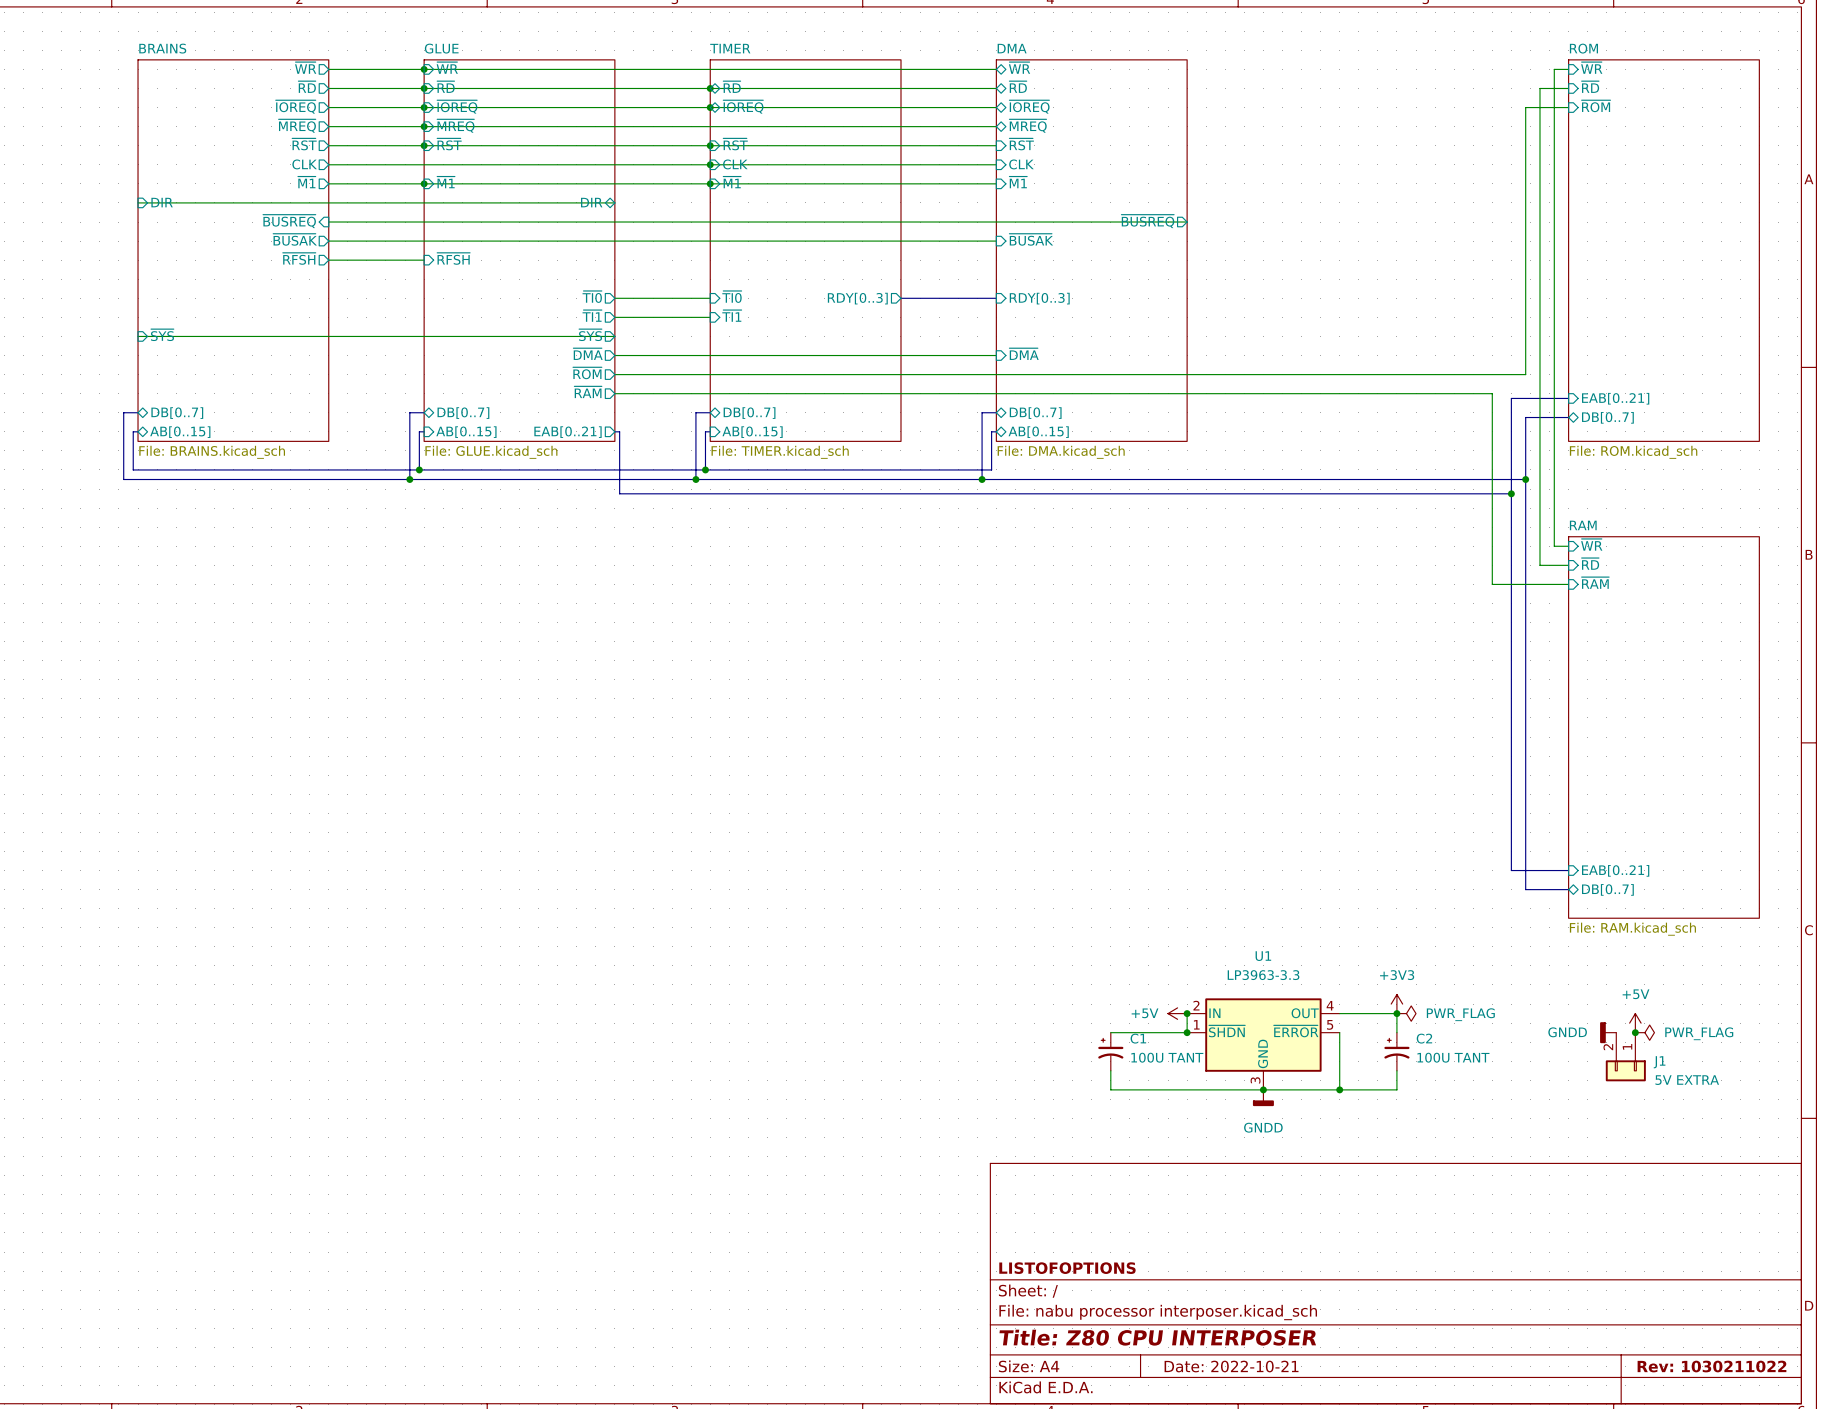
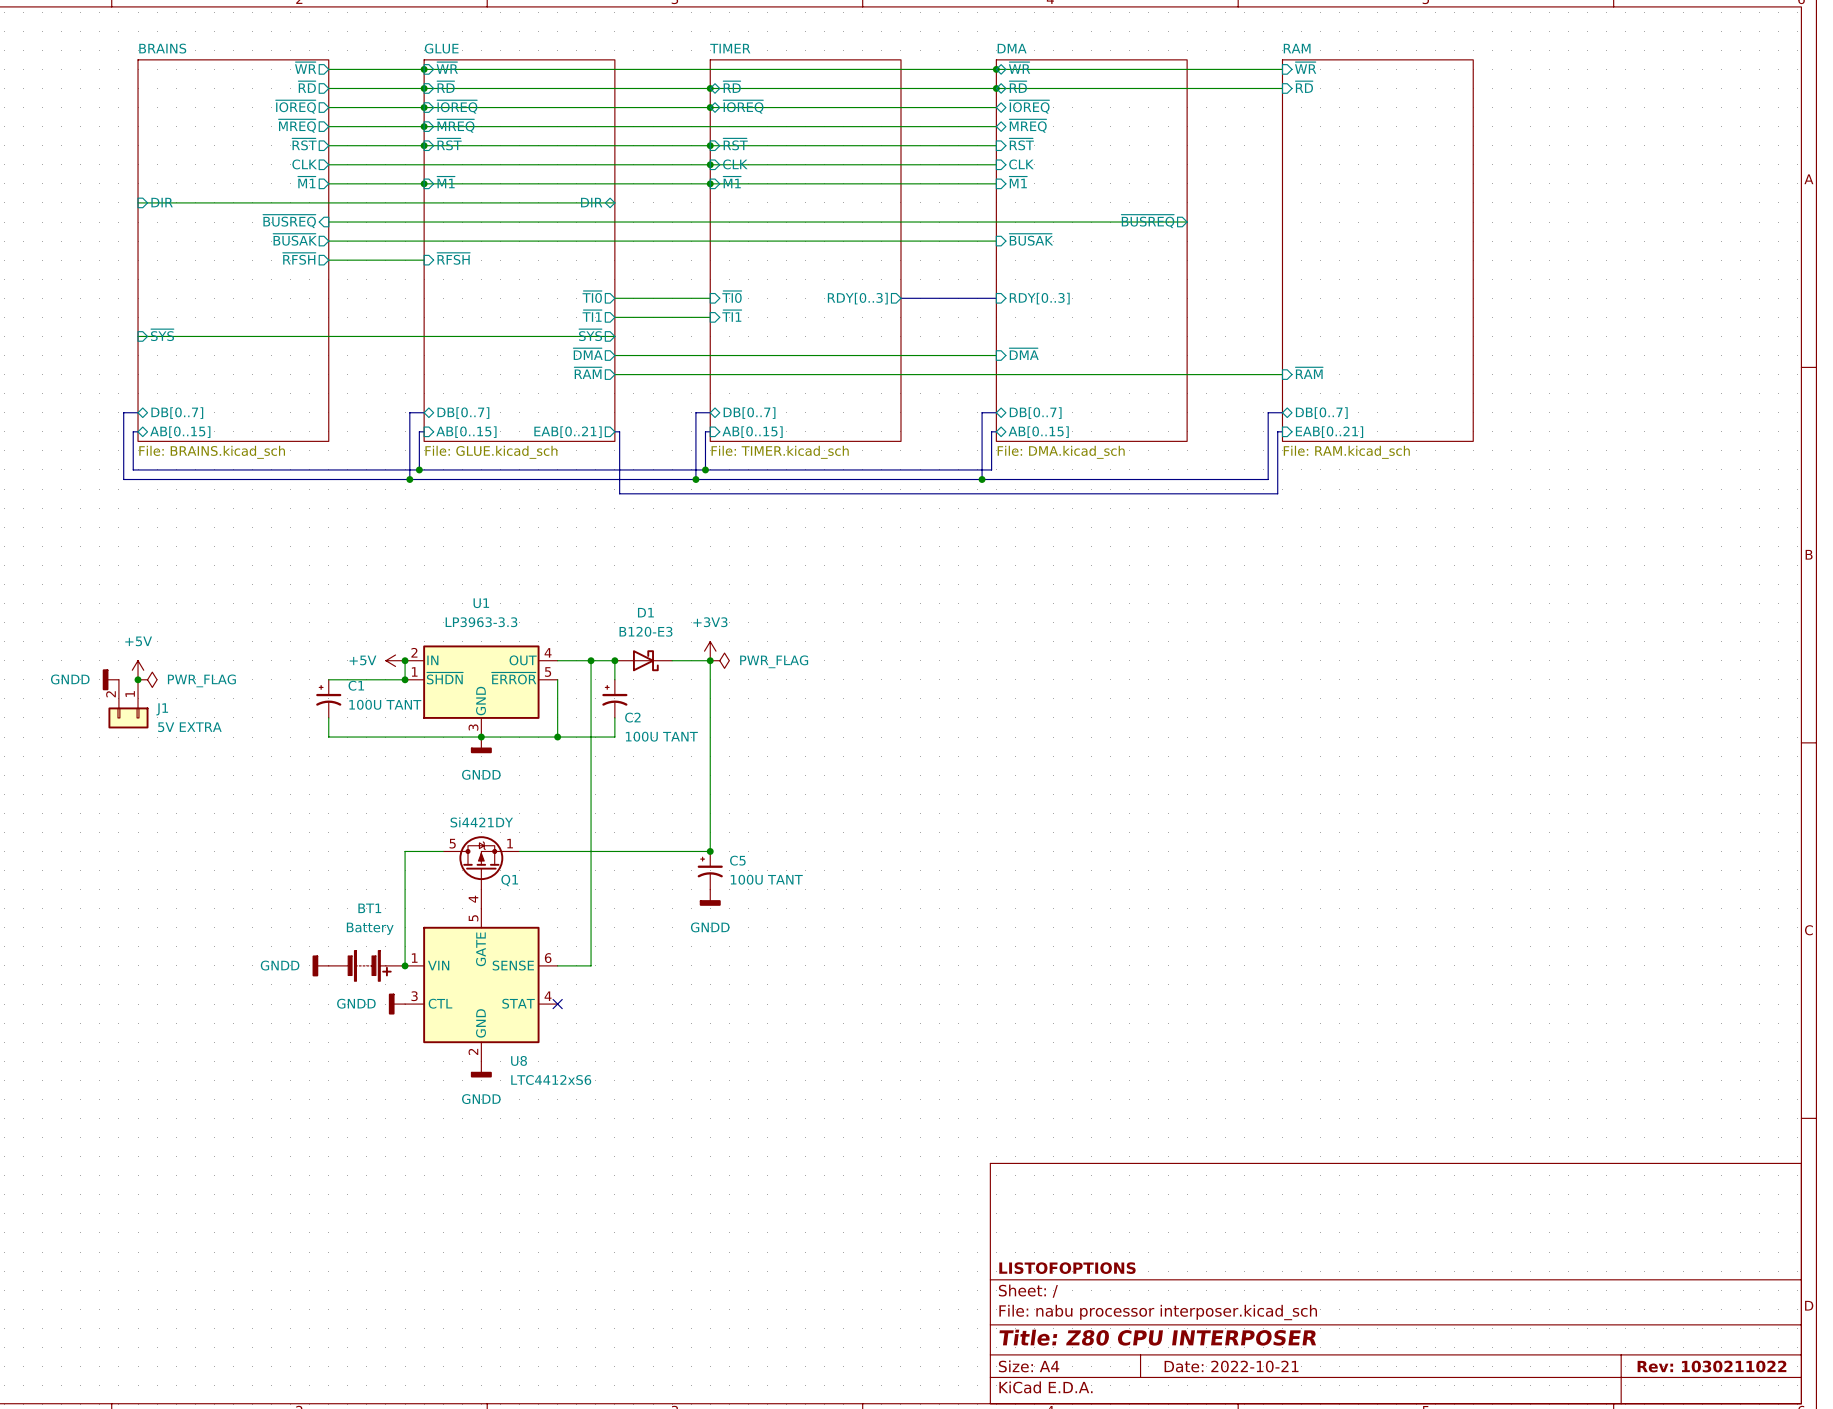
sheet pin: none -> ~{WR} (1305, 67)
sheet pin: ~{WR} (1591, 67) -> none
wire: none -> (996, 69) (1282, 69)
junction: none -> (996, 69)
wire: (1568, 69) (1554, 69) (1554, 546) (1568, 546) -> none
sheet pin: none -> ~{RD} (1304, 87)
sheet pin: ~{RD} (1590, 87) -> none
wire: none -> (996, 88) (1282, 88)
junction: none -> (996, 88)
wire: (1568, 88) (1539, 88) (1539, 565) (1568, 565) -> none
sheet pin: ~{ROM} (1596, 106) -> none
wire: (1568, 107) (1525, 107) (1525, 374) (1282, 374) -> none
sheet RAM: none -> File: RAM.kicad_sch (1377, 250)
sheet ROM: File: ROM.kicad_sch (1663, 250) -> none
sheet pin: ~{ROM} (587, 373) -> ~{RAM} (588, 373)
sheet pin: none -> ~{RAM} (1309, 373)
sheet pin: ~{RAM} (588, 392) -> none
wire: (614, 393) (1492, 393) (1492, 584) (1568, 584) -> none
bus: (1568, 398) (1511, 398) (1511, 870) (1568, 870) -> none
sheet pin: EAB[0..21] (1615, 398) -> none
sheet pin: none -> DB[0..7] (1321, 413)
bus: (1568, 417) (1525, 417) (1525, 889) (1568, 889) -> none
sheet pin: DB[0..7] (1607, 417) -> none
sheet pin: none -> EAB[0..21] (1329, 432)
bus: (1268, 479) (1525, 479) -> (1268, 479) (1268, 412) (1282, 412)
junction: (1525, 479) -> none
bus: (1277, 493) (1511, 493) -> (1277, 493) (1277, 431) (1282, 431)
junction: (1511, 493) -> none
sheet pin: ~{WR} (1591, 544) -> none
sheet pin: ~{RD} (1590, 563) -> none
sheet pin: ~{RAM} (1595, 582) -> none
power symbol: none -> +3V3 (710, 651)
power symbol: none -> +5V (395, 660)
wire: none -> (405, 660) (405, 679) (328, 679)
junction: none -> (405, 660)
wire: none -> (557, 660) (614, 660) (614, 679)
wire: none -> (591, 660) (591, 965) (557, 965)
junction: none -> (591, 660)
junction: none -> (614, 660)
D1: none -> B120-E3 (643, 660)
wire: none -> (672, 660) (710, 660) (710, 851) (519, 851)
junction: none -> (710, 660)
power symbol: none -> PWR_FLAG (719, 660)
power symbol: none -> +5V (138, 670)
power symbol: none -> GNDD (110, 679)
junction: none -> (138, 679)
power symbol: none -> PWR_FLAG (147, 679)
junction: none -> (405, 679)
wire: none -> (557, 679) (557, 737)
wire: none -> (328, 717) (328, 737) (614, 737) (614, 717)
sheet RAM: File: RAM.kicad_sch (1663, 727) -> none
junction: none -> (481, 737)
junction: none -> (557, 737)
power symbol: none -> GNDD (481, 745)
wire: none -> (443, 851) (405, 851) (405, 965)
junction: none -> (710, 851)
C5: none -> 100U TANT (710, 870)
sheet pin: EAB[0..21] (1615, 870) -> none
Q1: none -> Si4421DY (481, 872)
sheet pin: DB[0..7] (1607, 889) -> none
power symbol: none -> GNDD (710, 897)
power symbol: none -> GNDD (320, 965)
BT1: none -> Battery (366, 965)
junction: none -> (405, 965)
U8: none -> LTC4412xS6 (481, 984)
power symbol: none -> GNDD (396, 1004)
no-connect mark: none -> (557, 1004)
power symbol: +3V3 (1396, 1004) -> none
power symbol: +5V (1177, 1013) -> none
wire: (1187, 1013) (1187, 1032) (1110, 1032) -> none
junction: (1187, 1013) -> none
wire: (1339, 1013) (1396, 1013) (1396, 1032) -> none
junction: (1396, 1013) -> none
power symbol: PWR_FLAG (1406, 1013) -> none
power symbol: +5V (1635, 1023) -> none
junction: (1187, 1032) -> none
wire: (1339, 1032) (1339, 1089) -> none
power symbol: GNDD (1608, 1032) -> none
junction: (1635, 1032) -> none
power symbol: PWR_FLAG (1644, 1032) -> none
C2 name position: C2 (1424, 1038) -> C2 (632, 717)
U1 position: (1263, 1044) -> (481, 691)
C1 position: (1110, 1051) -> (328, 698)
C2 position: (1396, 1051) -> (614, 698)
J1 position: (1625, 1056) -> (128, 704)
C2 value position: 100U TANT (1453, 1057) -> 100U TANT (661, 736)
power symbol: none -> GNDD (481, 1069)
wire: (1110, 1070) (1110, 1089) (1396, 1089) (1396, 1070) -> none
junction: (1263, 1089) -> none
junction: (1339, 1089) -> none
power symbol: GNDD (1263, 1098) -> none

